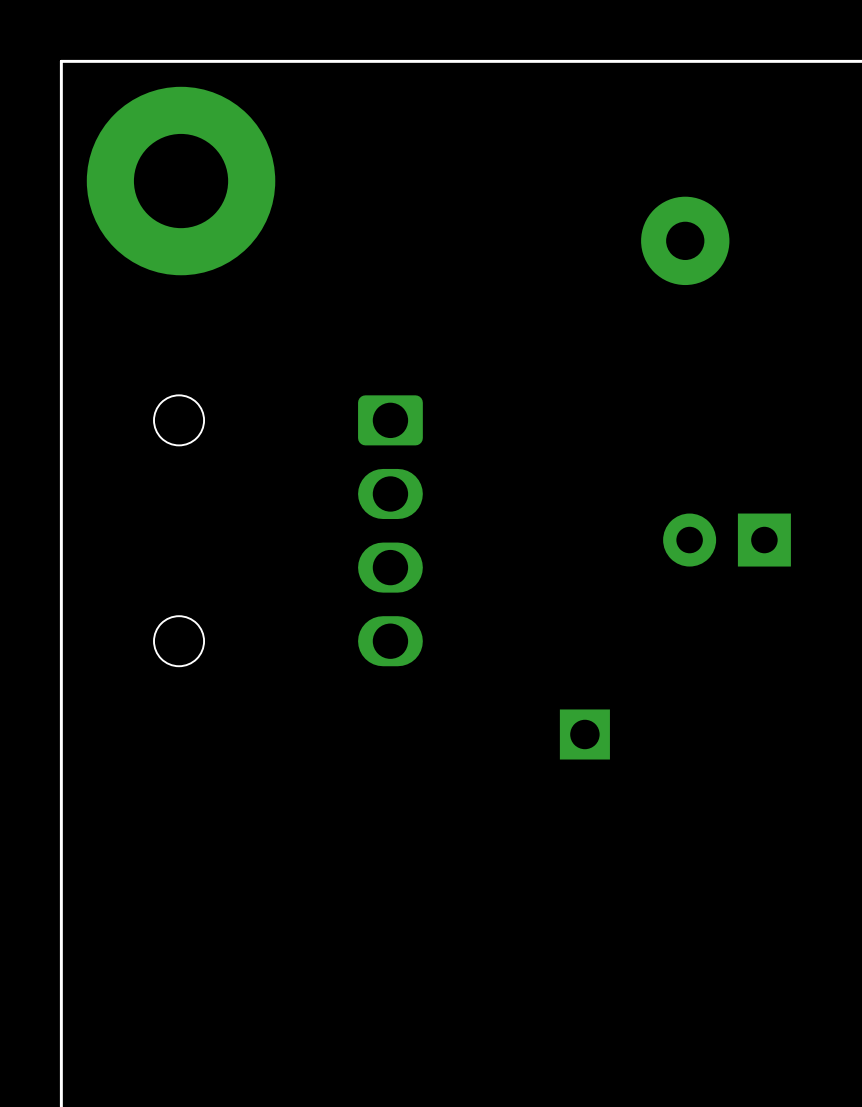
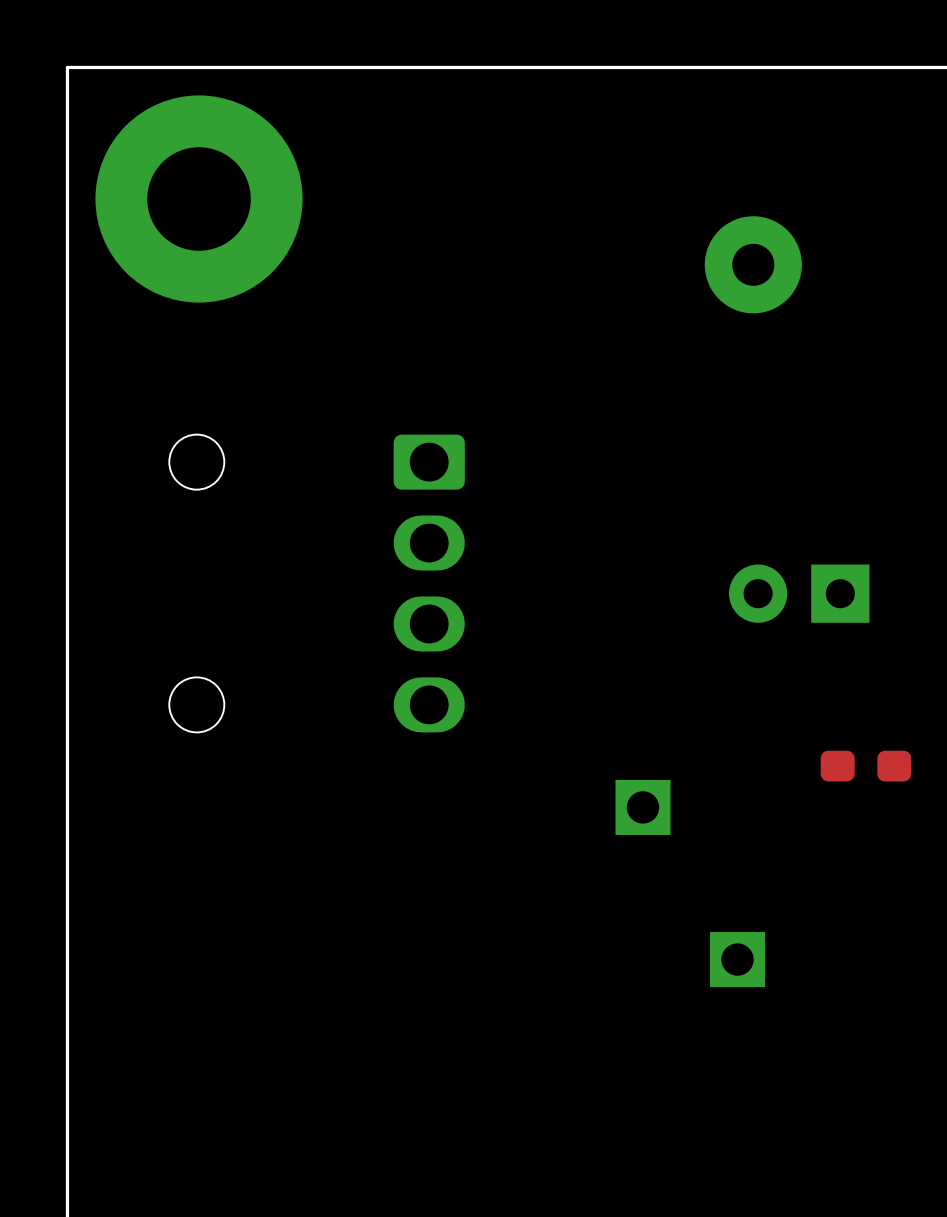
part: none -> (866, 766)
part: none -> (737, 959)

